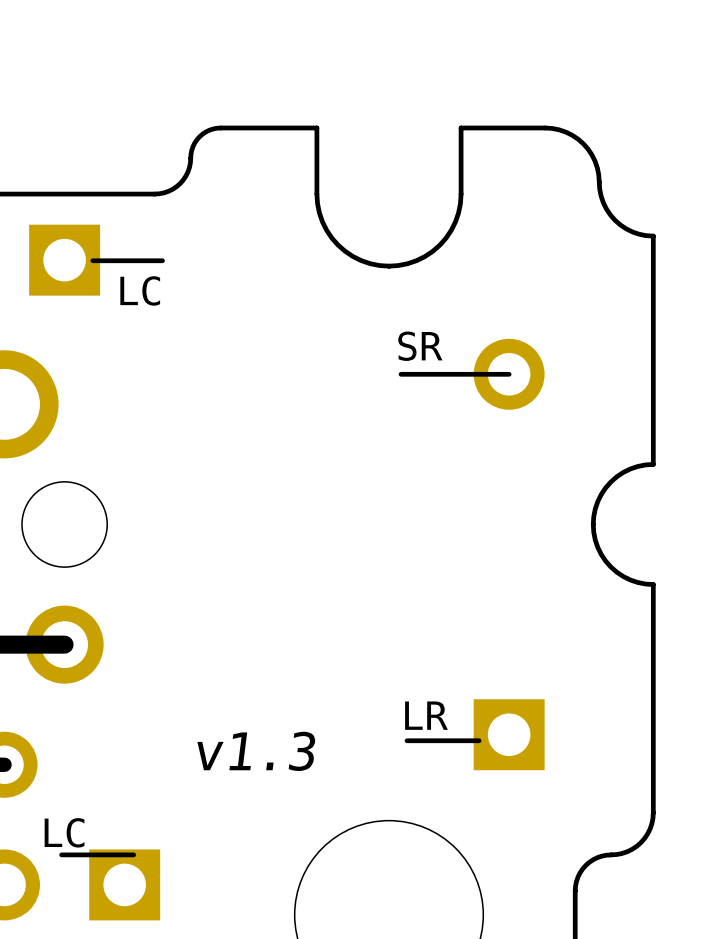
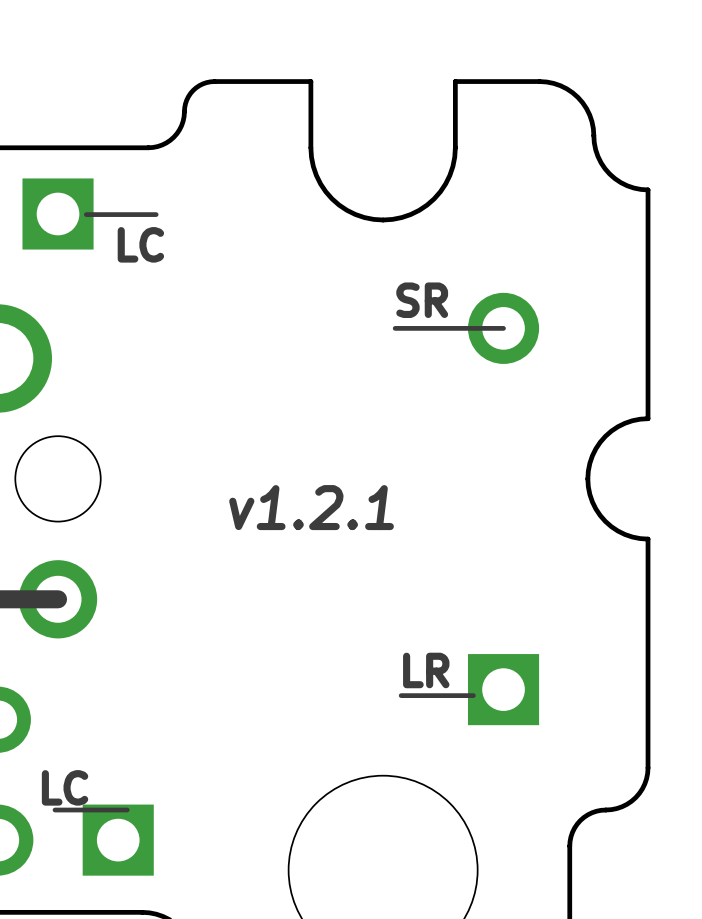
text: none -> v1.2.1 (311, 507)
text: v1.3 (256, 751) -> none

